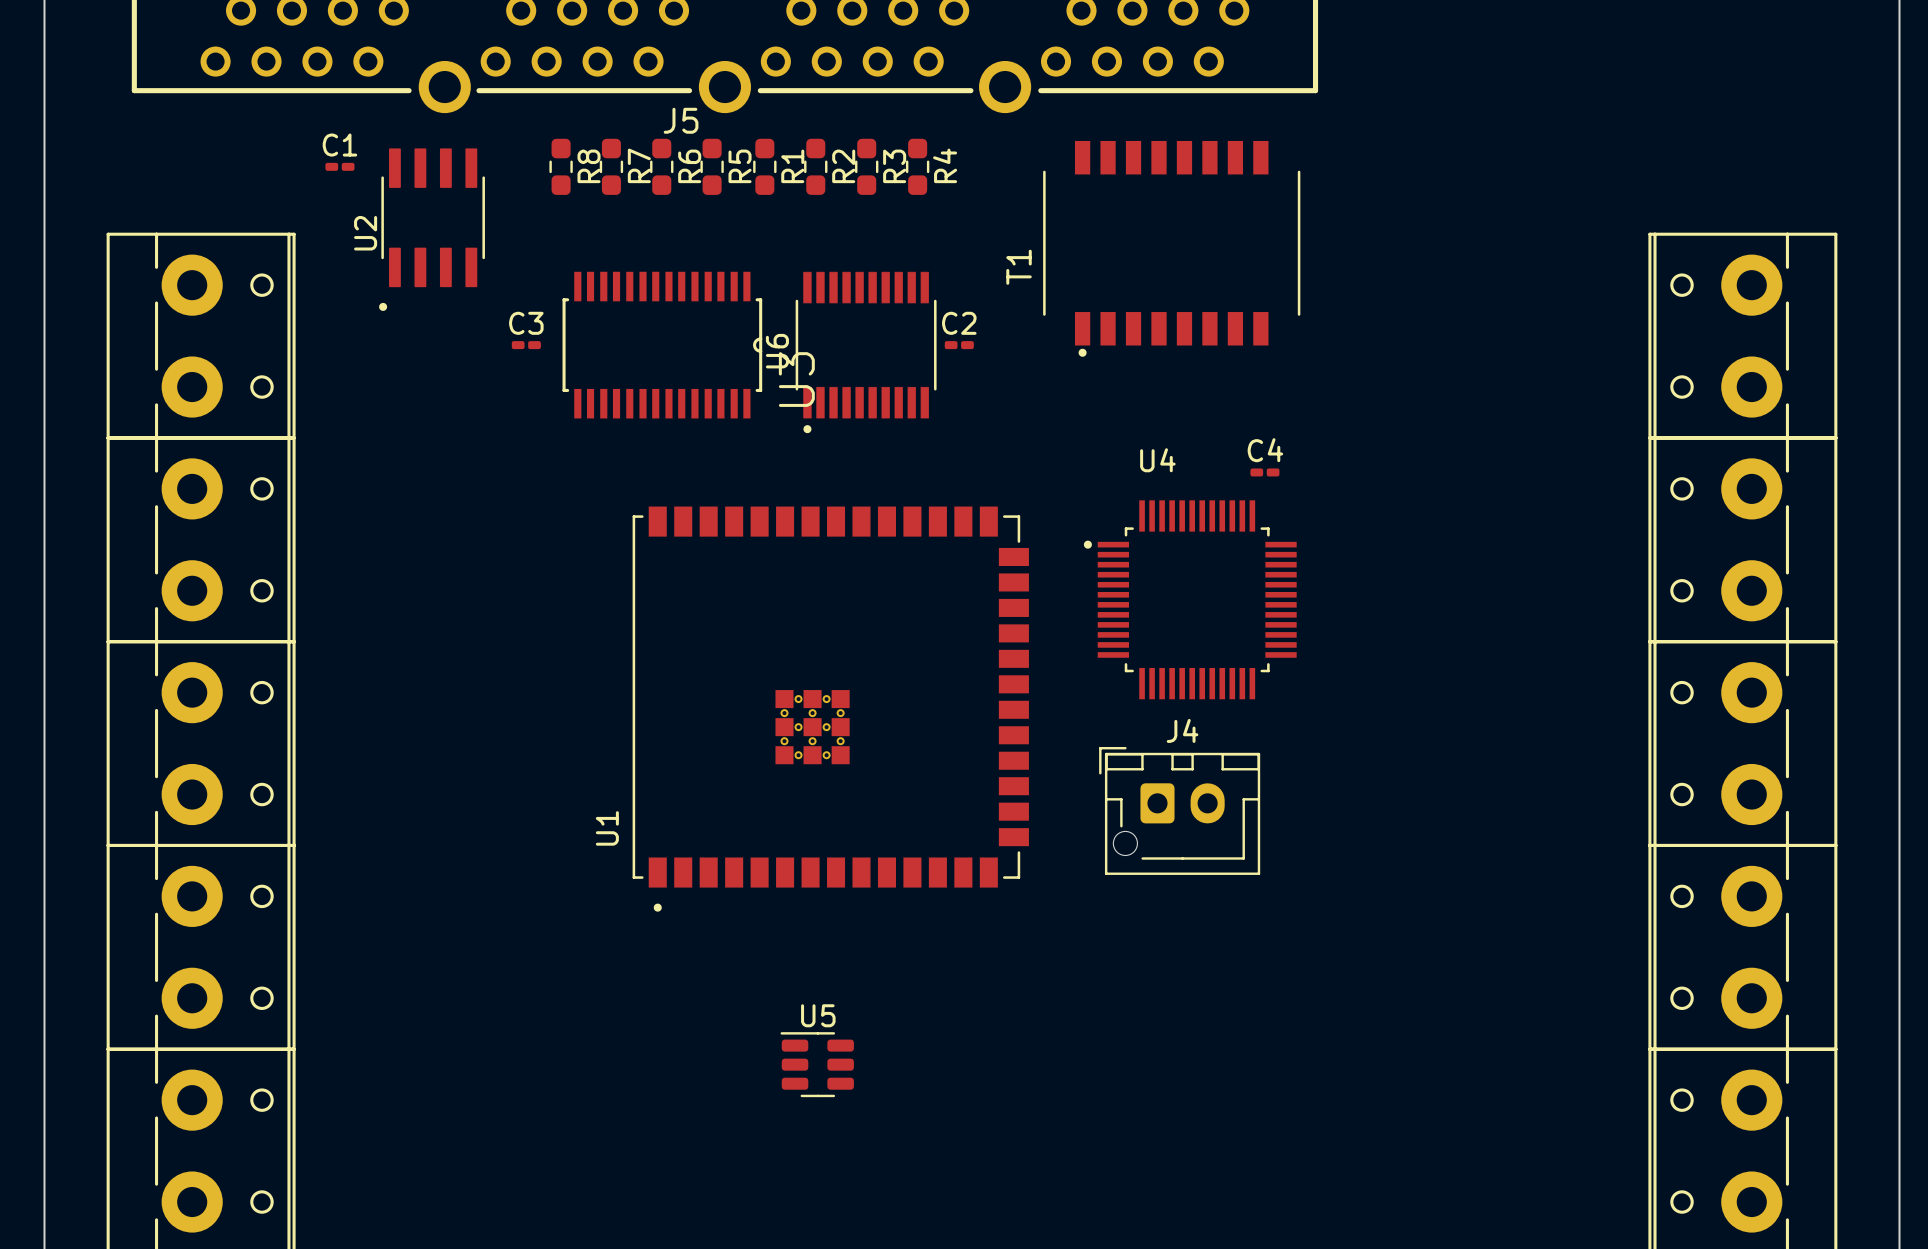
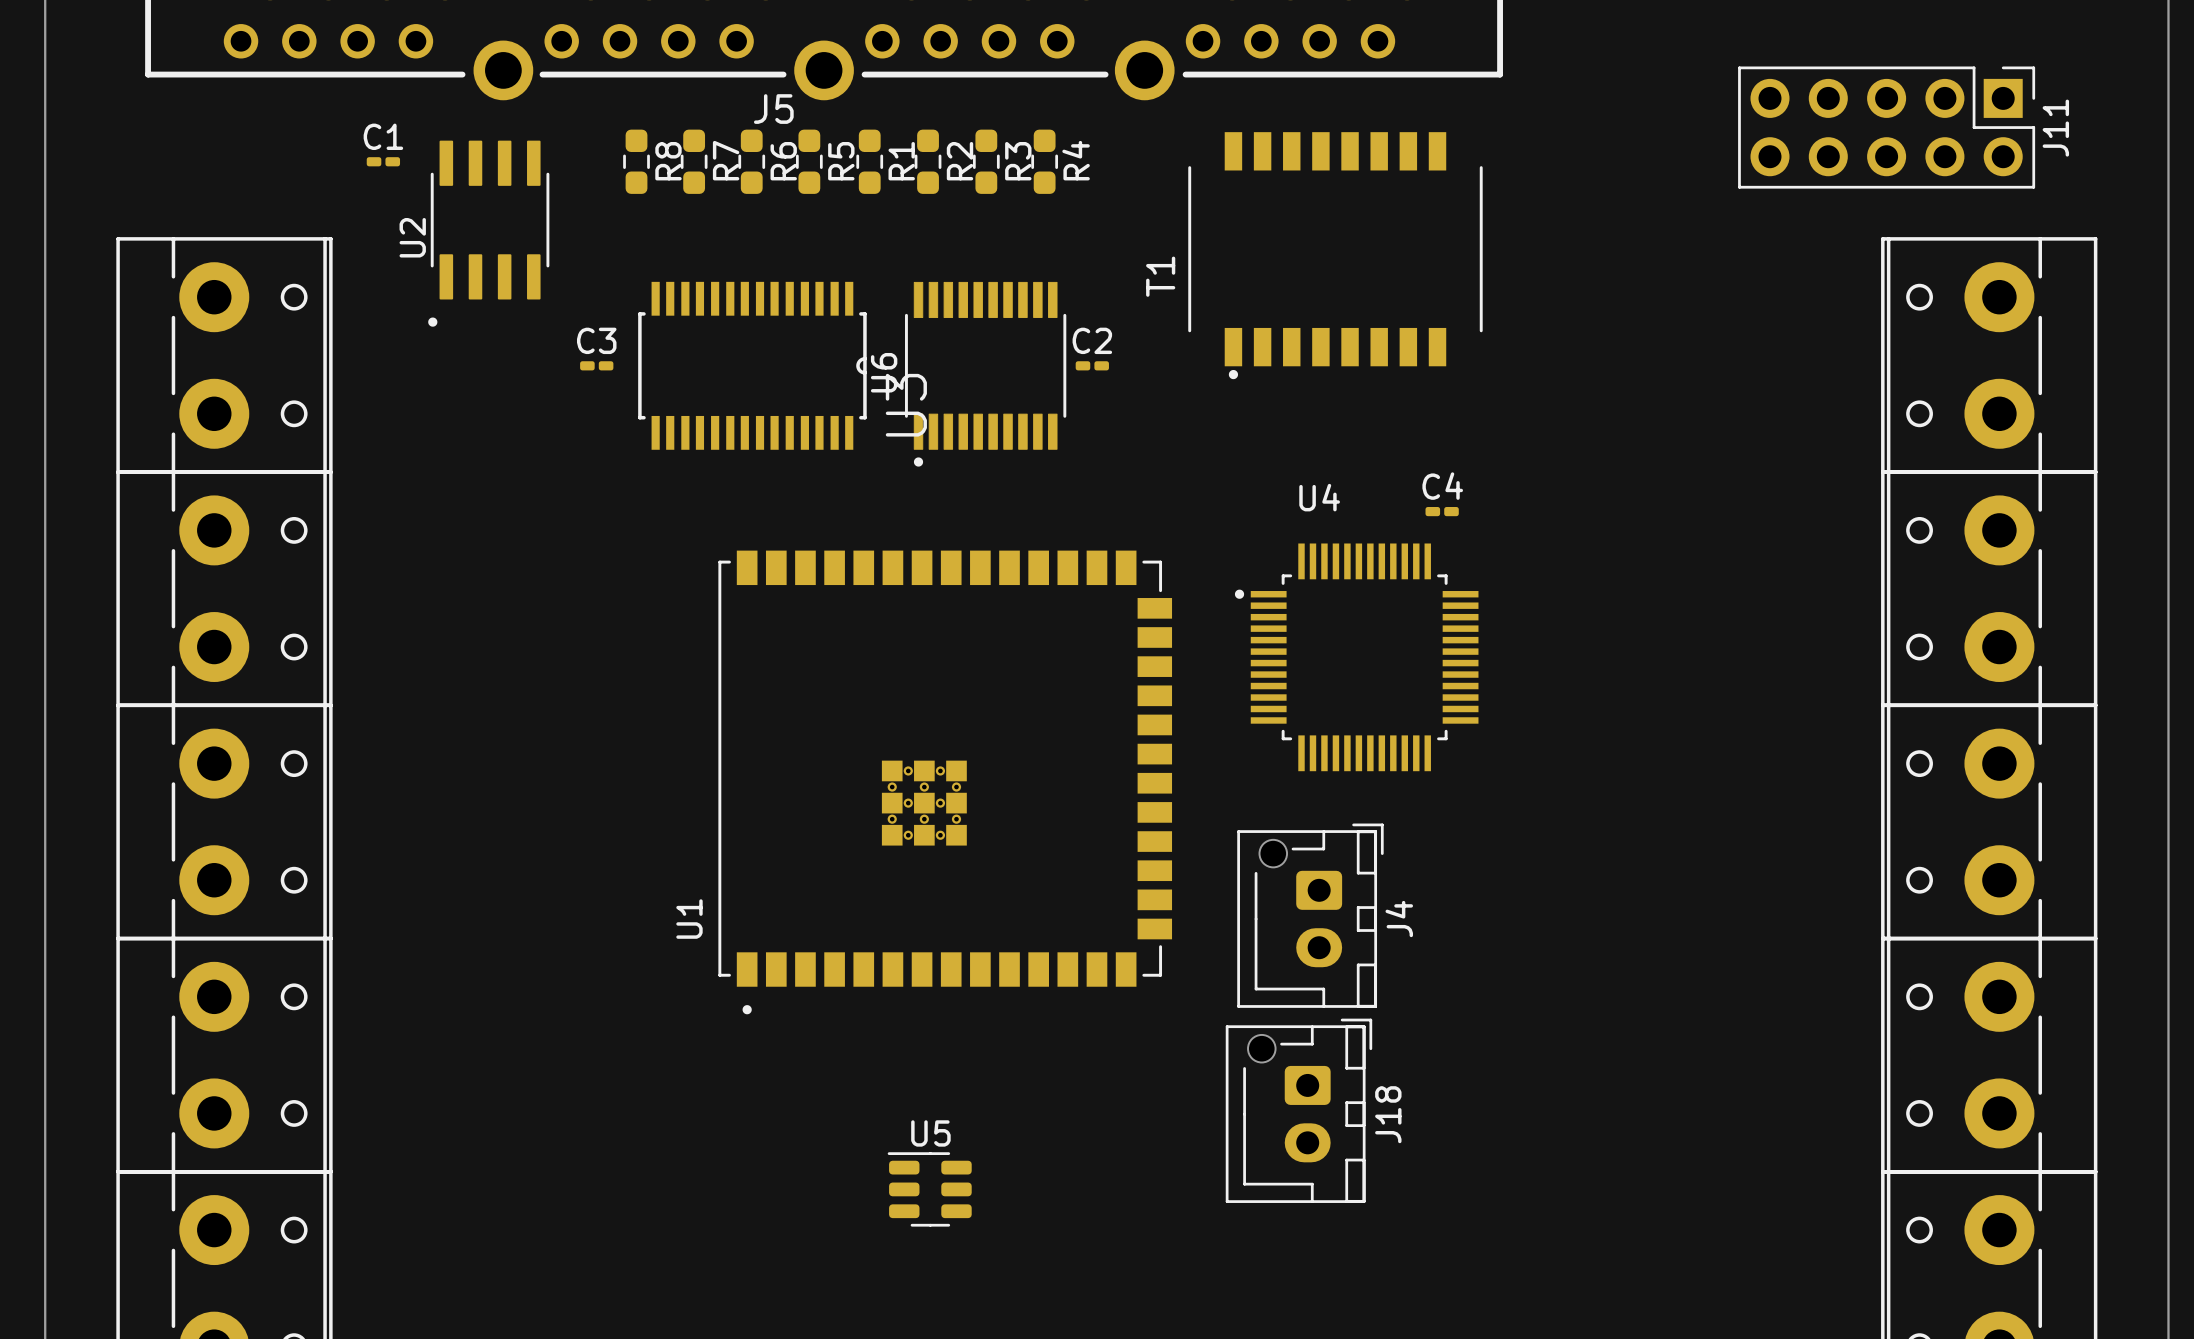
J11: none -> (1886, 127)
J4 rotation: 0° (1179, 810) -> 90° clockwise (1310, 915)
J18: none -> (1298, 1110)

